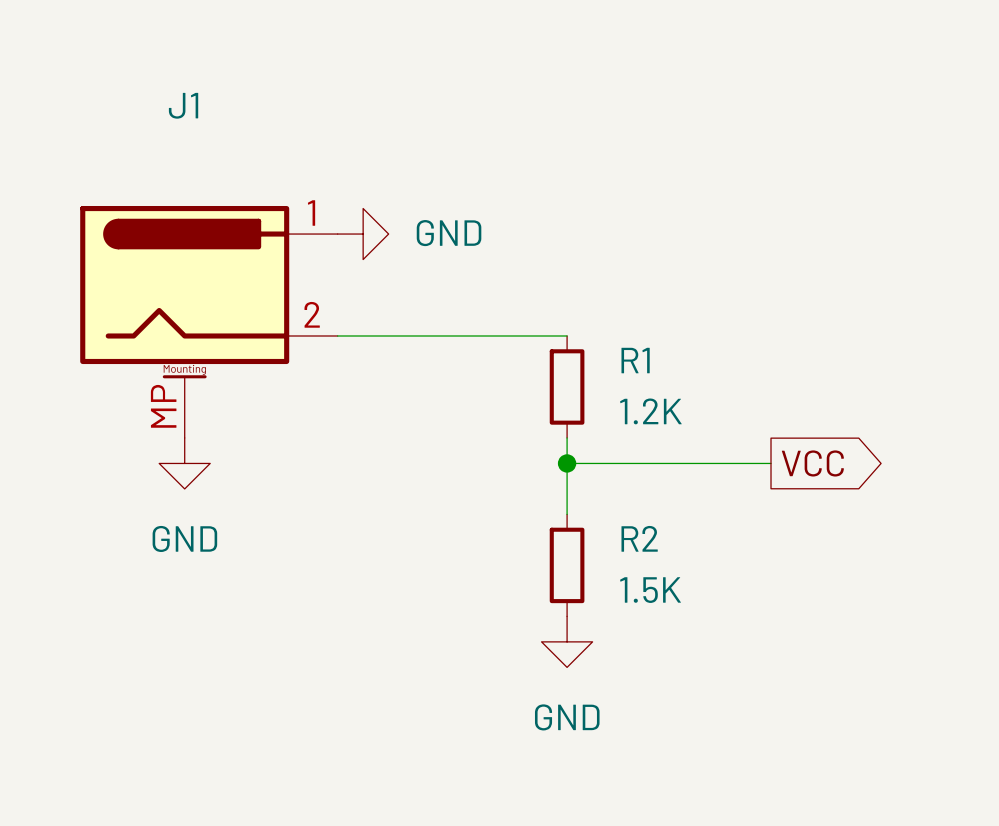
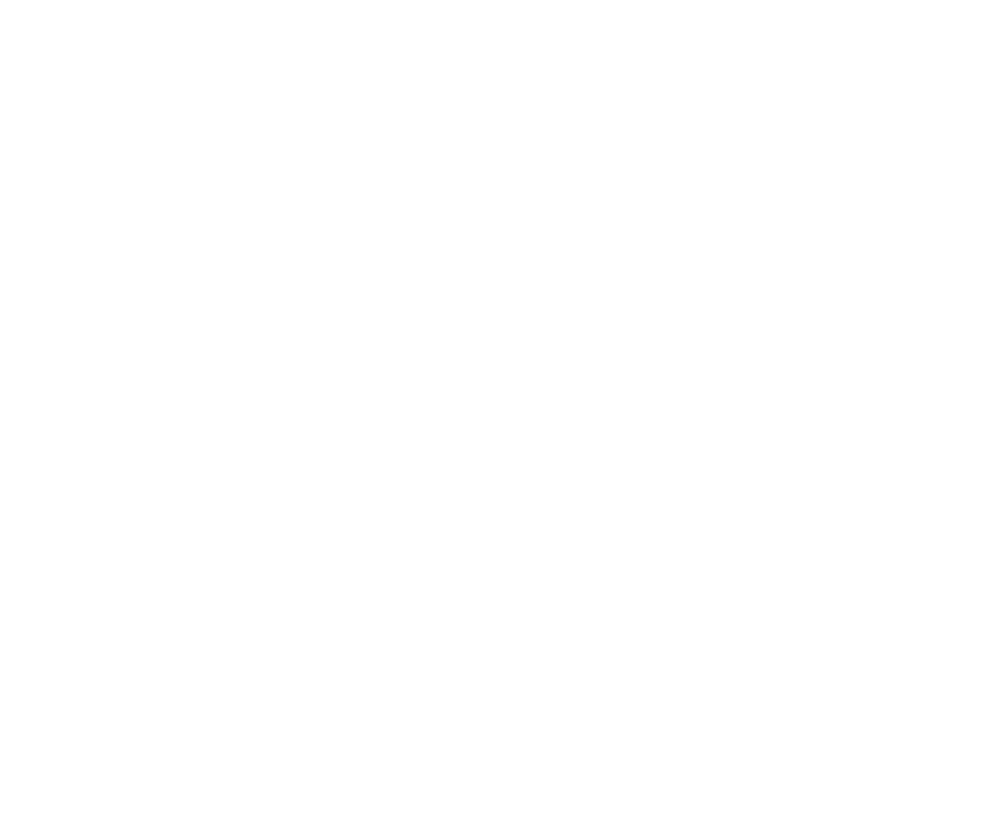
power symbol: GND (363, 234) -> none
J1: (208, 321) -> none
wire: (337, 336) (567, 336) -> none
R1: 1.2K (567, 386) -> none
wire: (567, 437) (567, 514) -> none
power symbol: GND (184, 463) -> none
wire: (567, 463) (771, 463) -> none
junction: (567, 463) -> none
global label: VCC (812, 463) -> none
R2: 1.5K (567, 565) -> none
power symbol: GND (567, 641) -> none

